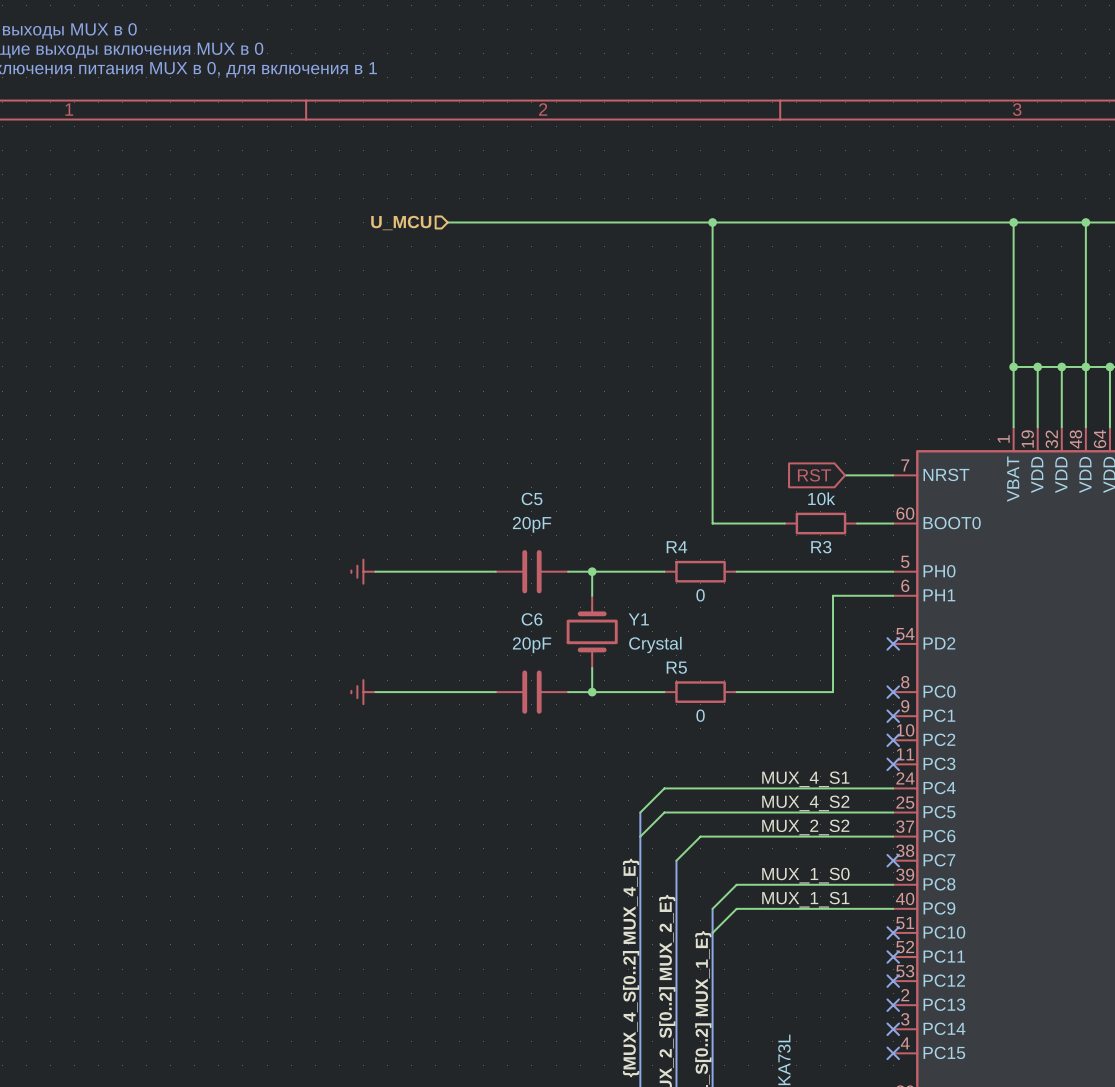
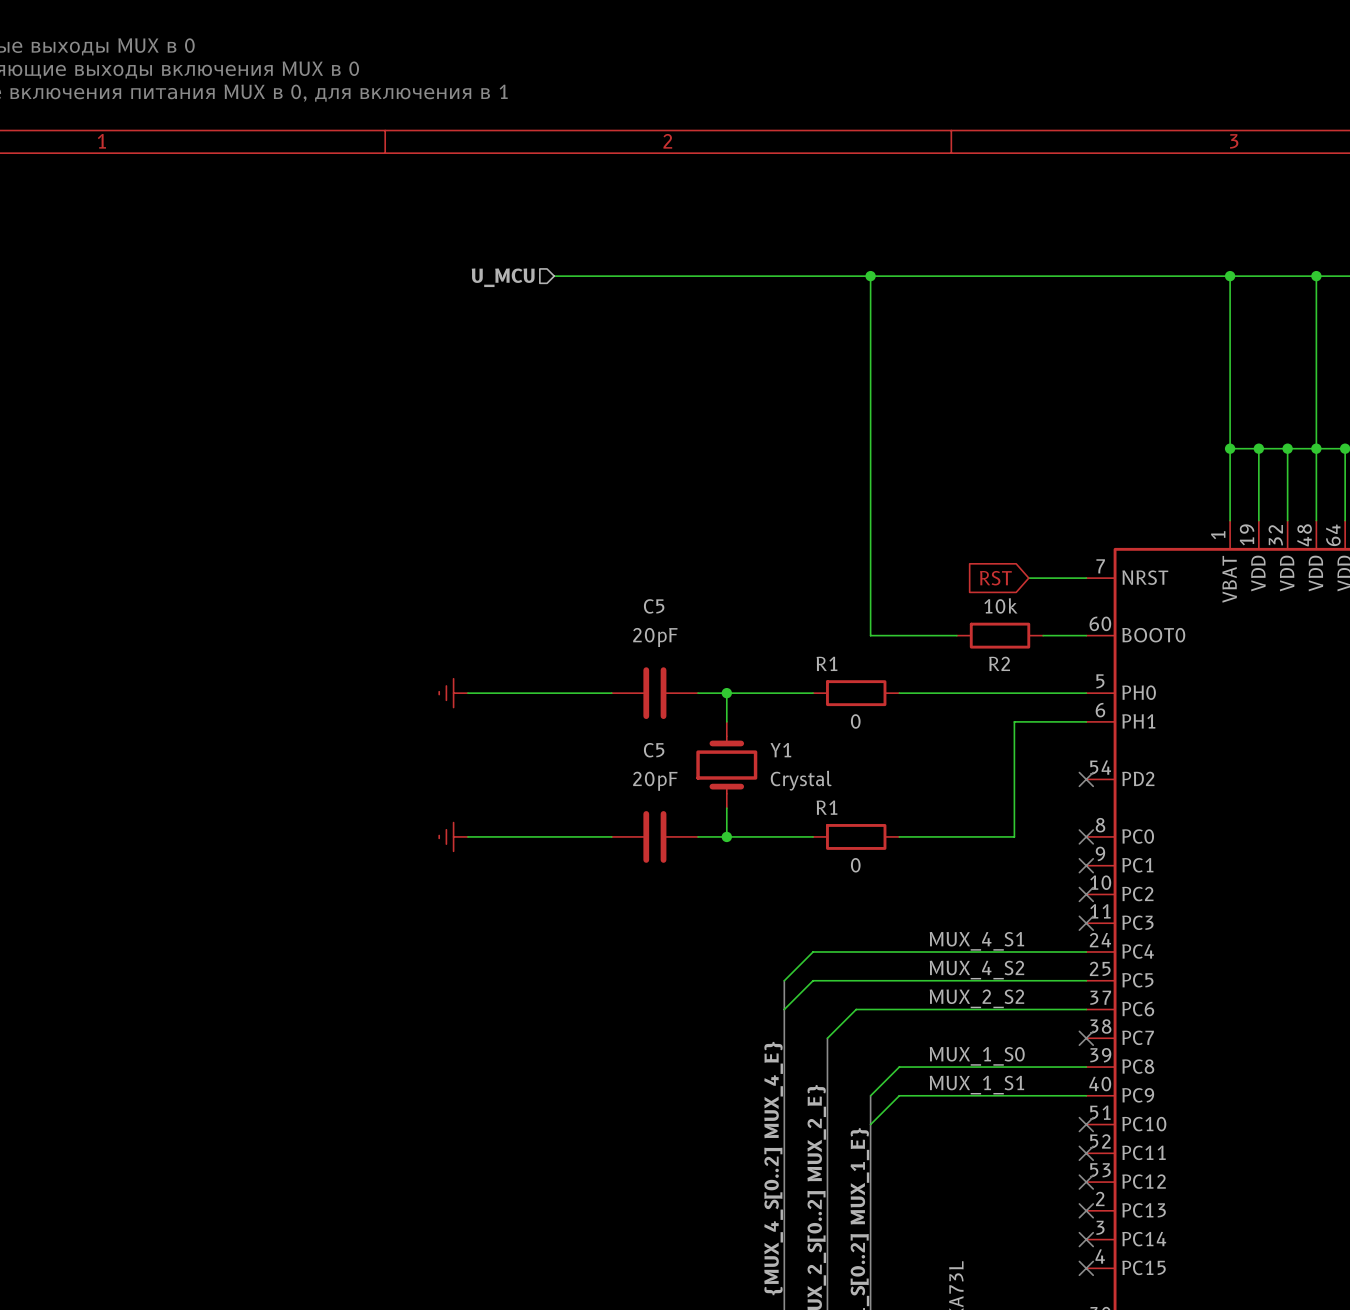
R4 name: R4 (676, 547) -> R1 (827, 663)
R3 name: R3 (821, 547) -> R2 (999, 663)
C6 name: C6 (532, 619) -> C5 (654, 750)
R5 name: R5 (676, 667) -> R1 (827, 807)

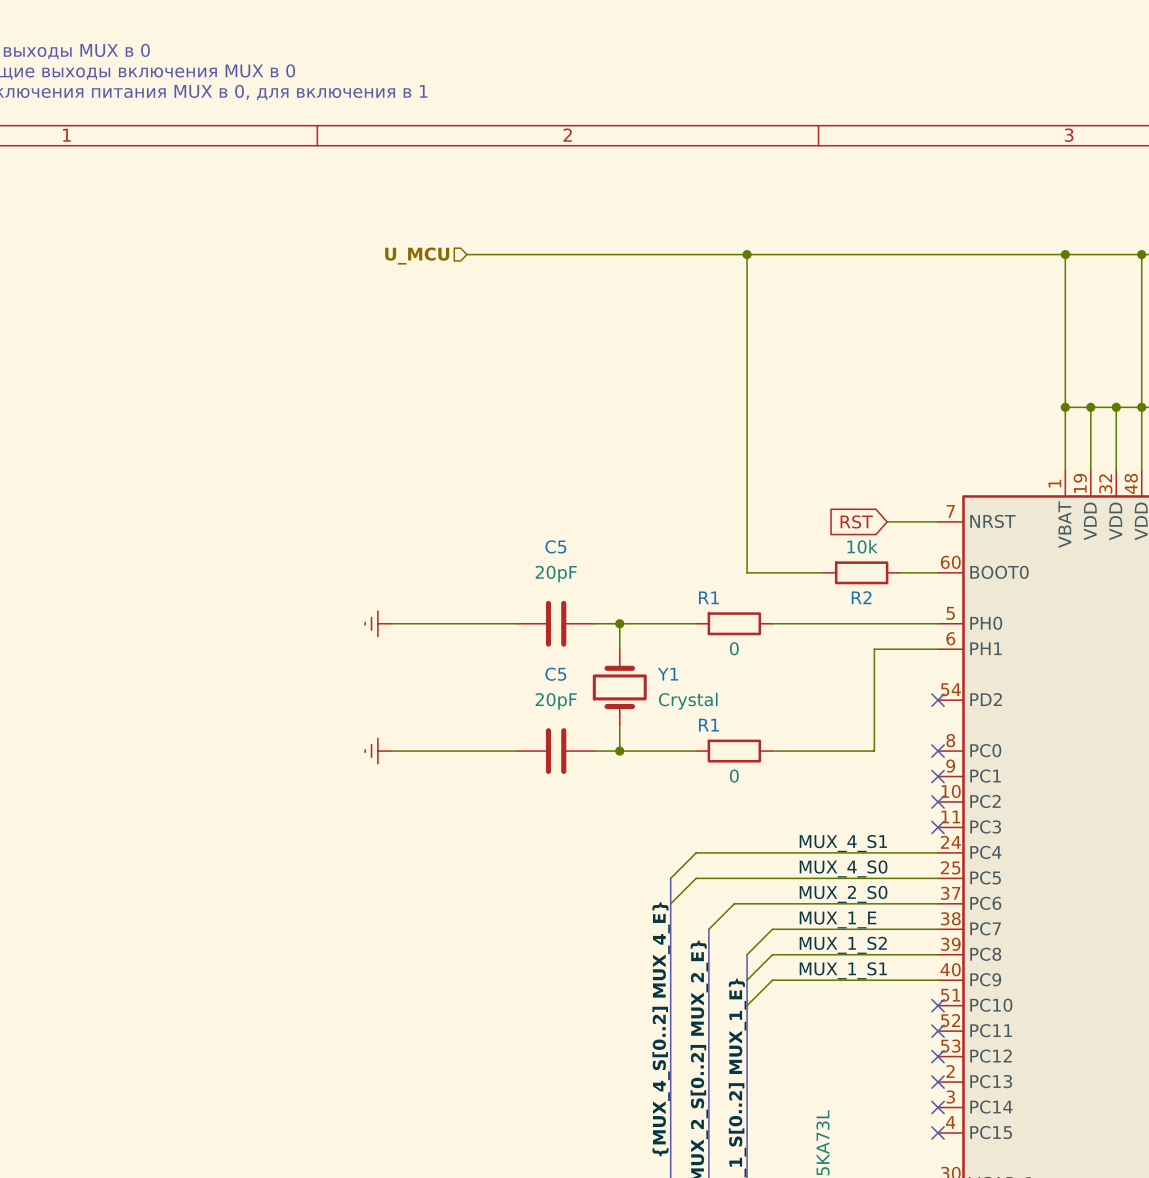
label: MUX_4_S2 (976, 970) -> MUX_4_S0 (843, 868)
label: MUX_2_S2 (976, 998) -> MUX_2_S0 (843, 894)
label: none -> MUX_1_E (838, 919)
wire: none -> (938, 929) (772, 929) (747, 954)
no-connect mark: (1086, 1038) -> none
label: MUX_1_S0 (977, 1056) -> MUX_1_S2 (843, 945)
bus: none -> (747, 954) (747, 980)

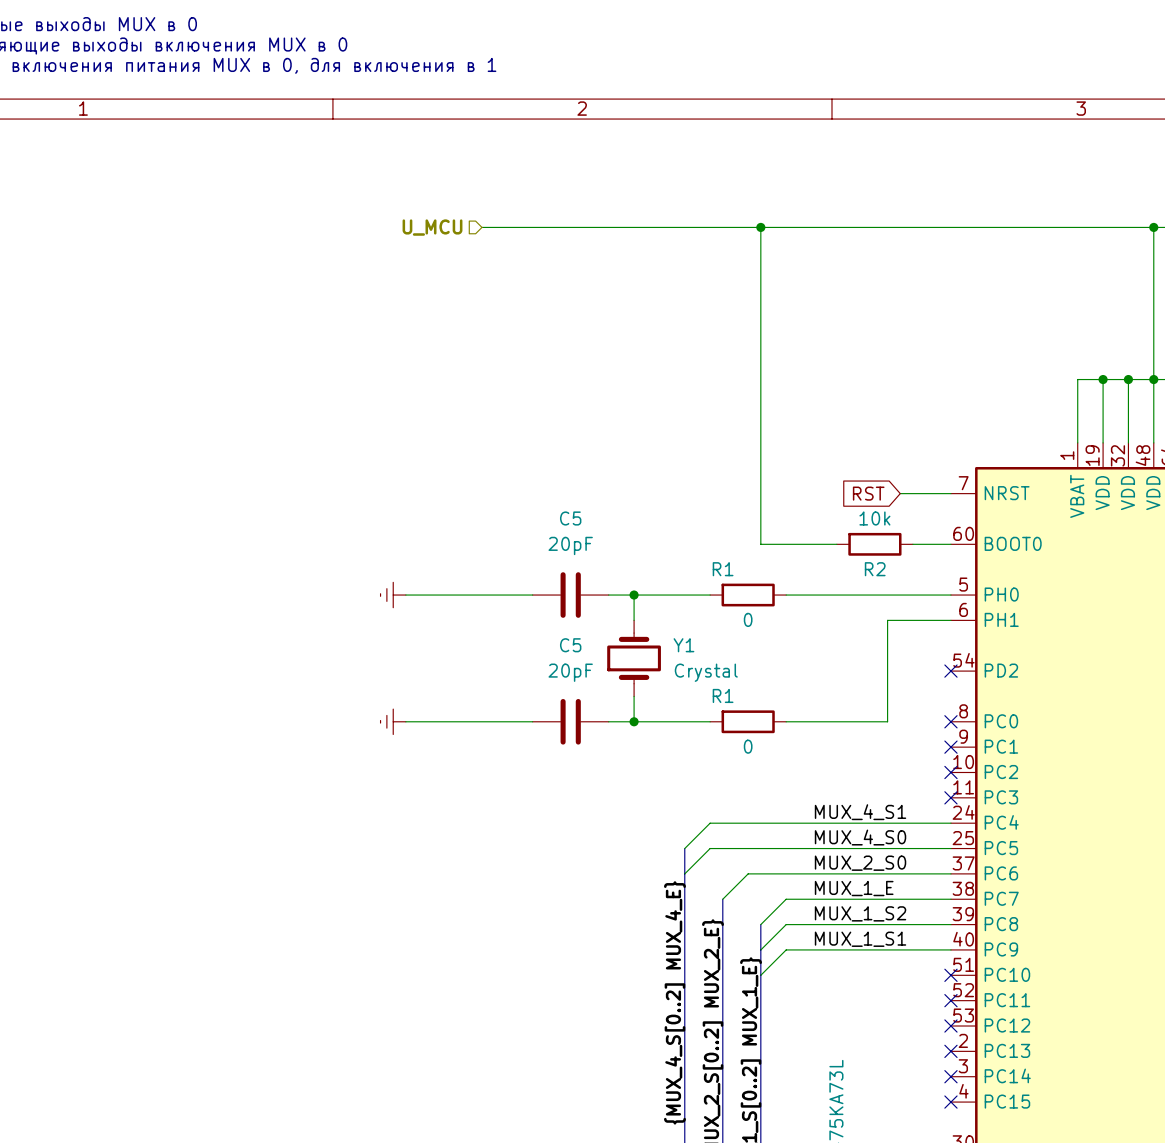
wire: (1065, 254) (1065, 407) -> none
junction: (1065, 254) -> none
junction: (1065, 407) -> none

